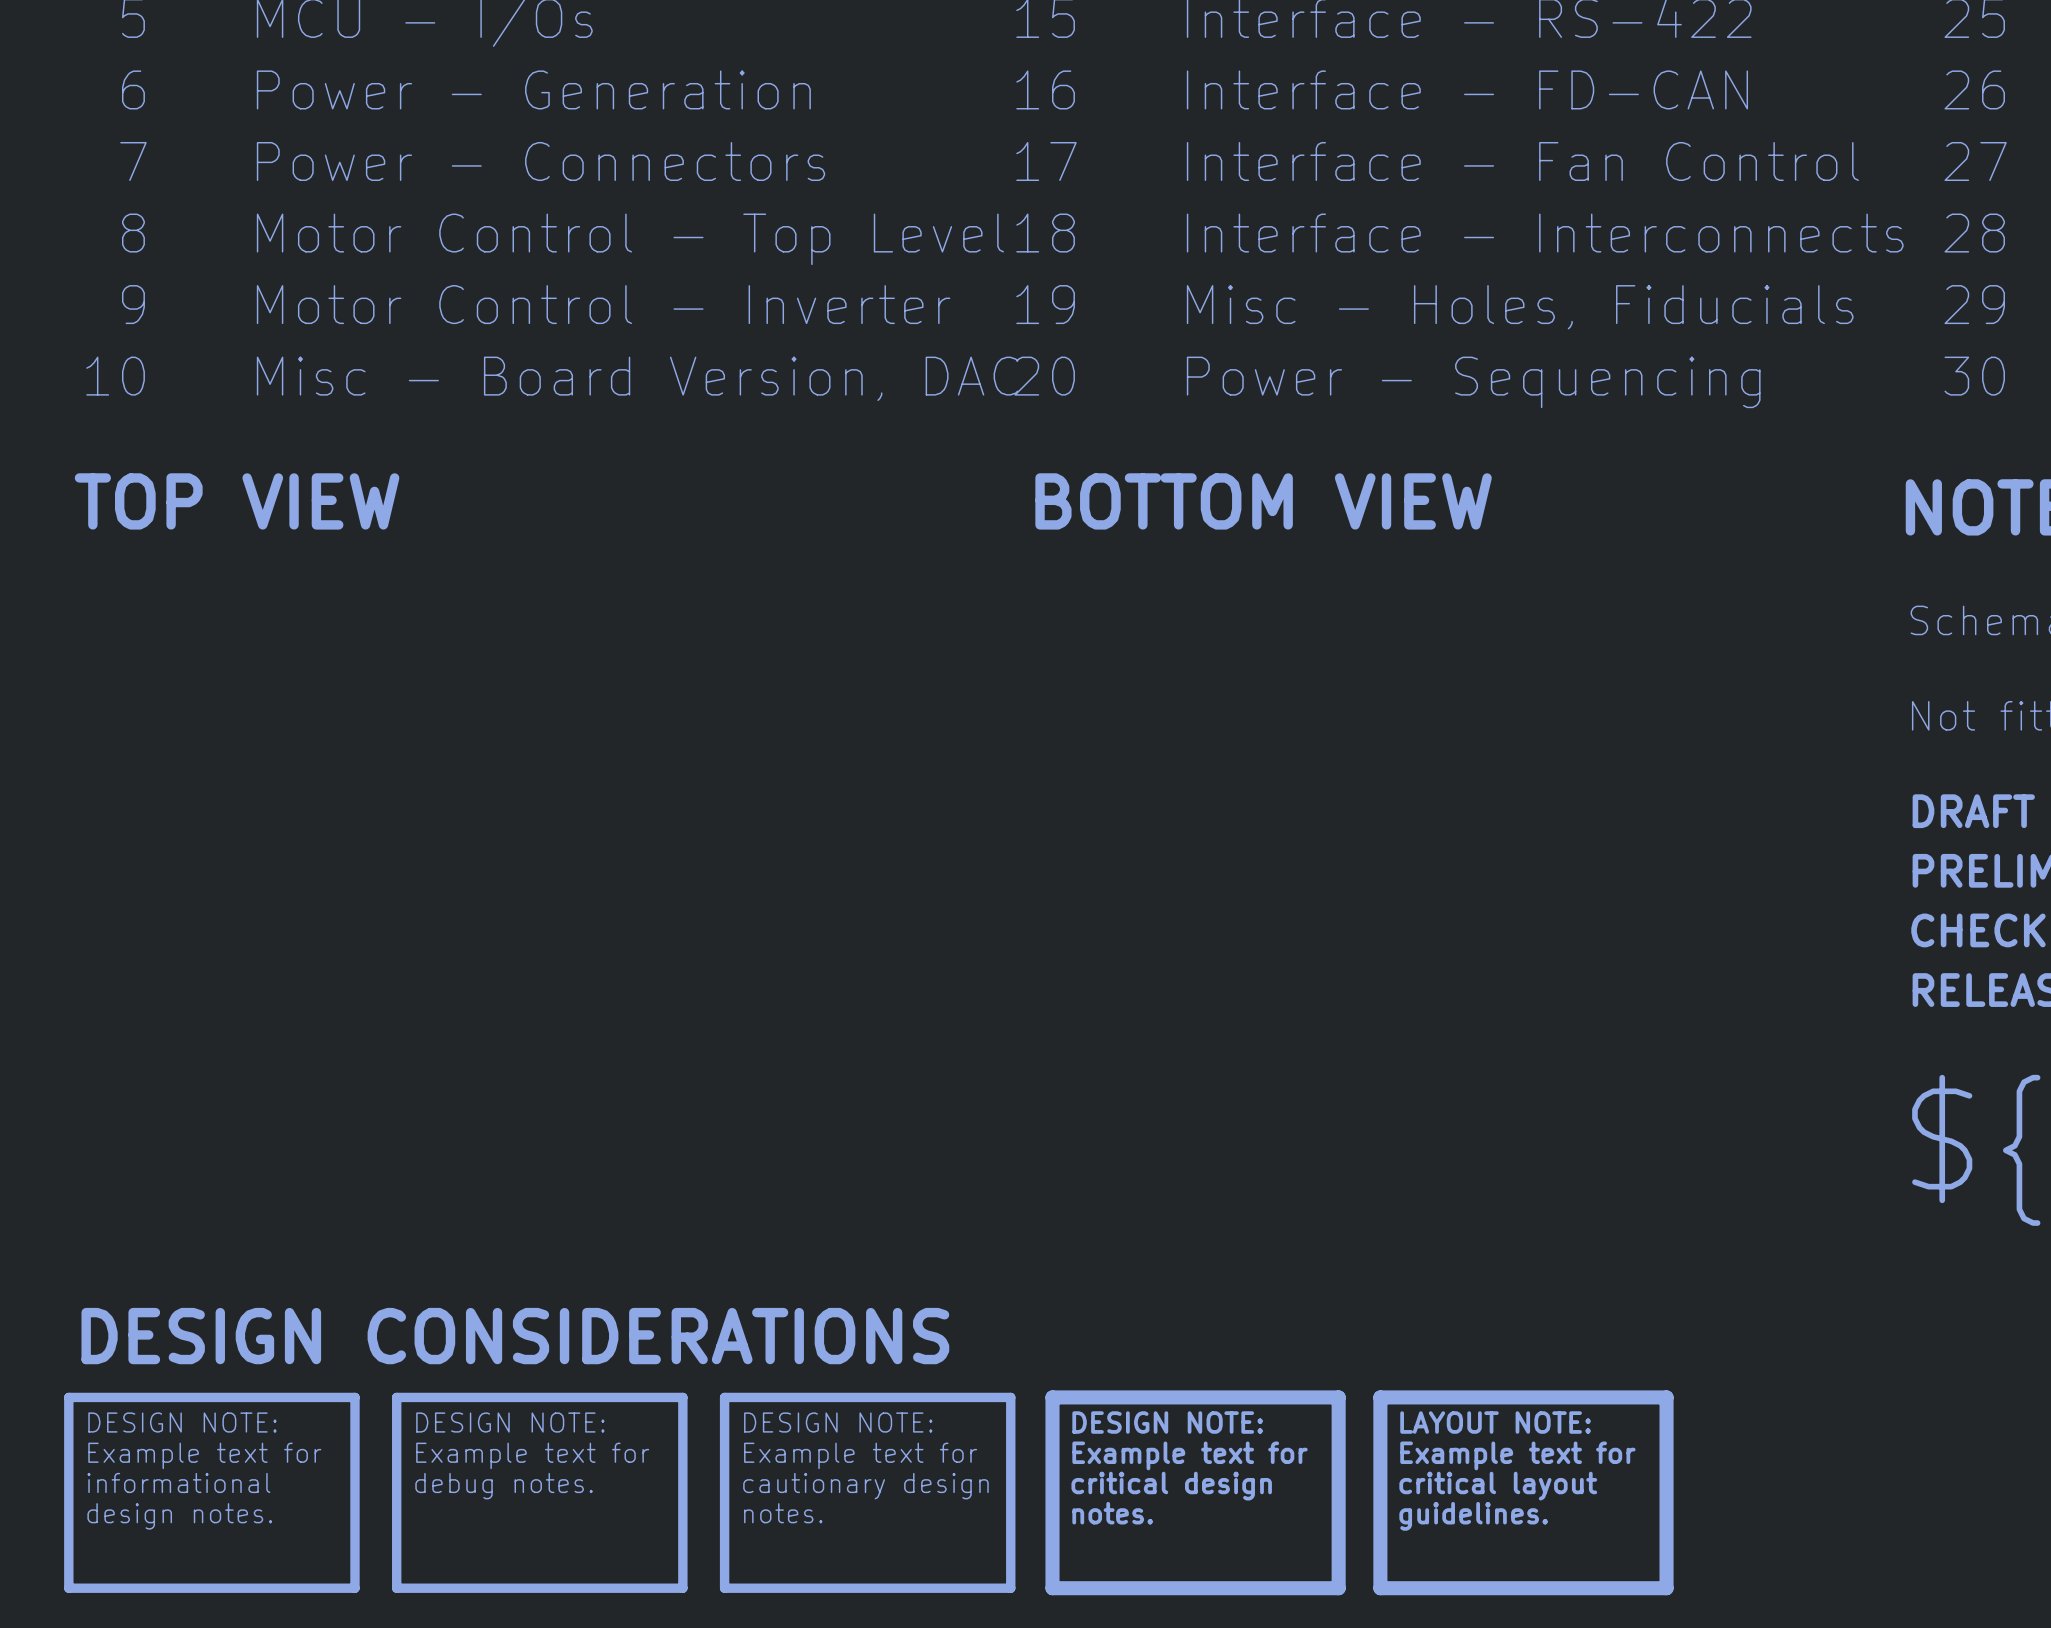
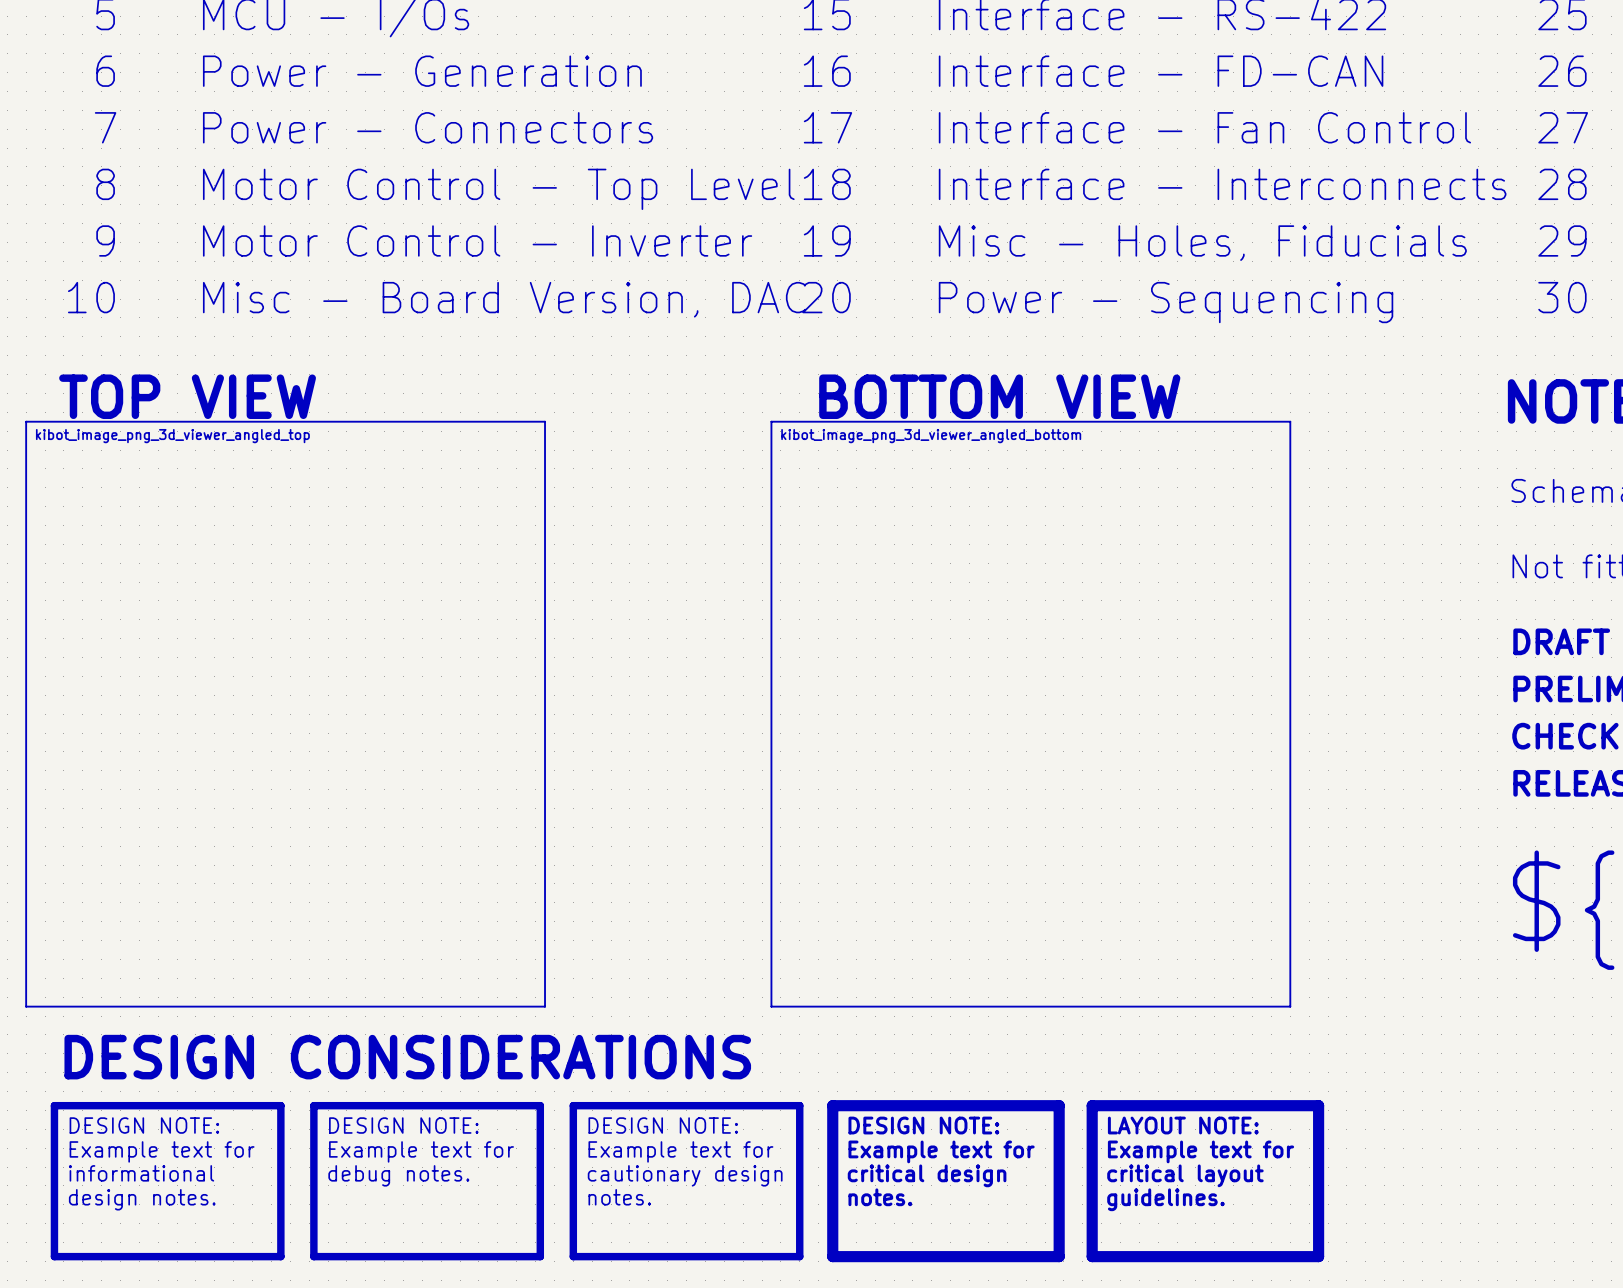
line: none -> (26, 421) (545, 421) (545, 1006) (26, 1006) (26, 421)
line: none -> (771, 421) (1290, 421) (1290, 1006) (771, 1006) (771, 421)
text: none -> kibot_image_png_3d_viewer_angled_top (172, 436)
text: none -> kibot_image_png_3d_viewer_angled_bottom (931, 436)

